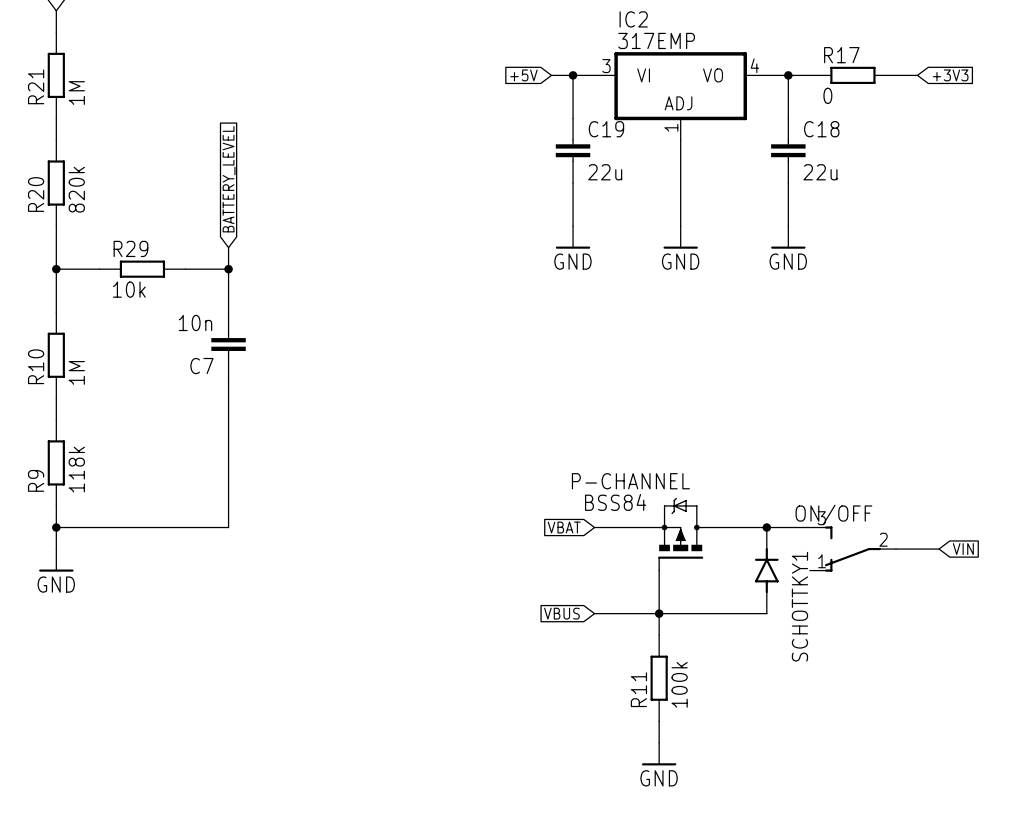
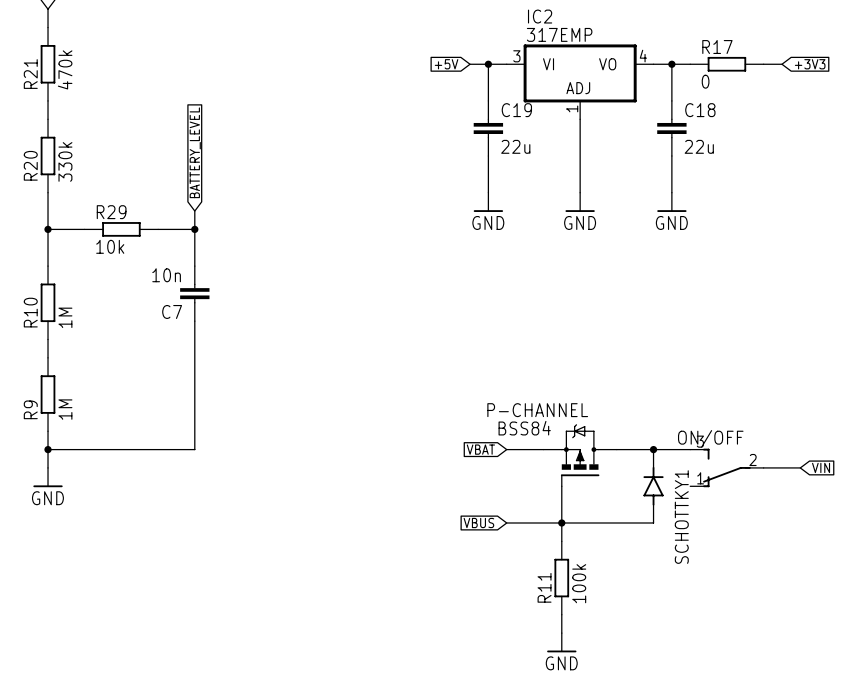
R21 value: 1M (76, 93) -> 470k (65, 69)
R20 value: 820k (76, 189) -> 330k (65, 161)
R9 value: 118k (76, 469) -> 1M (65, 409)

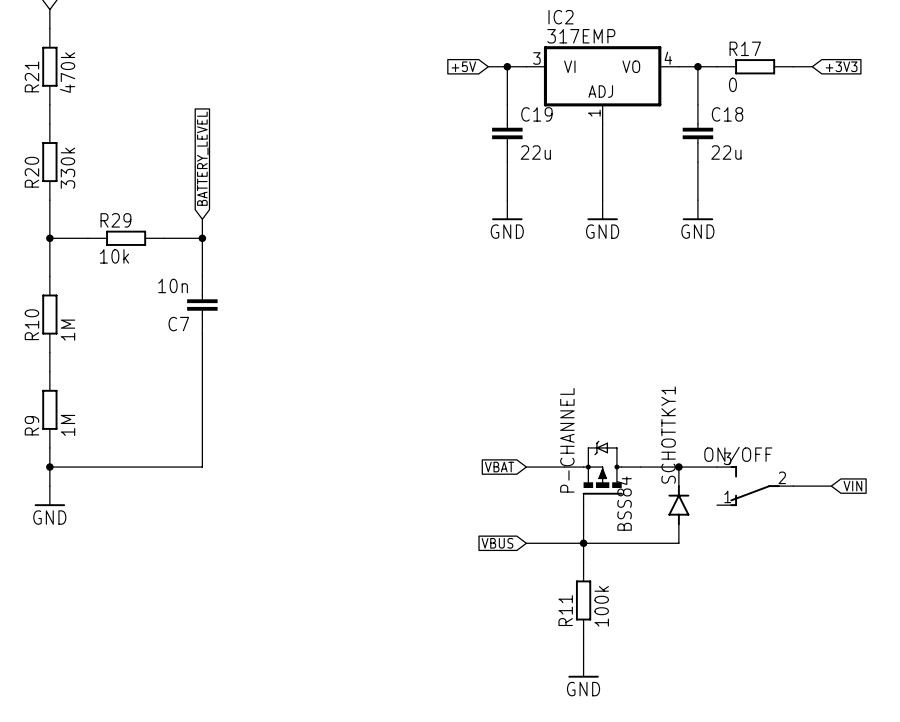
P-CHANNEL name rotation: 0° (537, 410) -> 90° counterclockwise (567, 440)
P-CHANNEL value rotation: 0° (524, 428) -> 90° counterclockwise (624, 503)
P-CHANNEL value position: BSS84 (524, 428) -> BSS84 (624, 503)
SCHOTTKY1 name position: SCHOTTKY1 (681, 517) -> SCHOTTKY1 (668, 435)

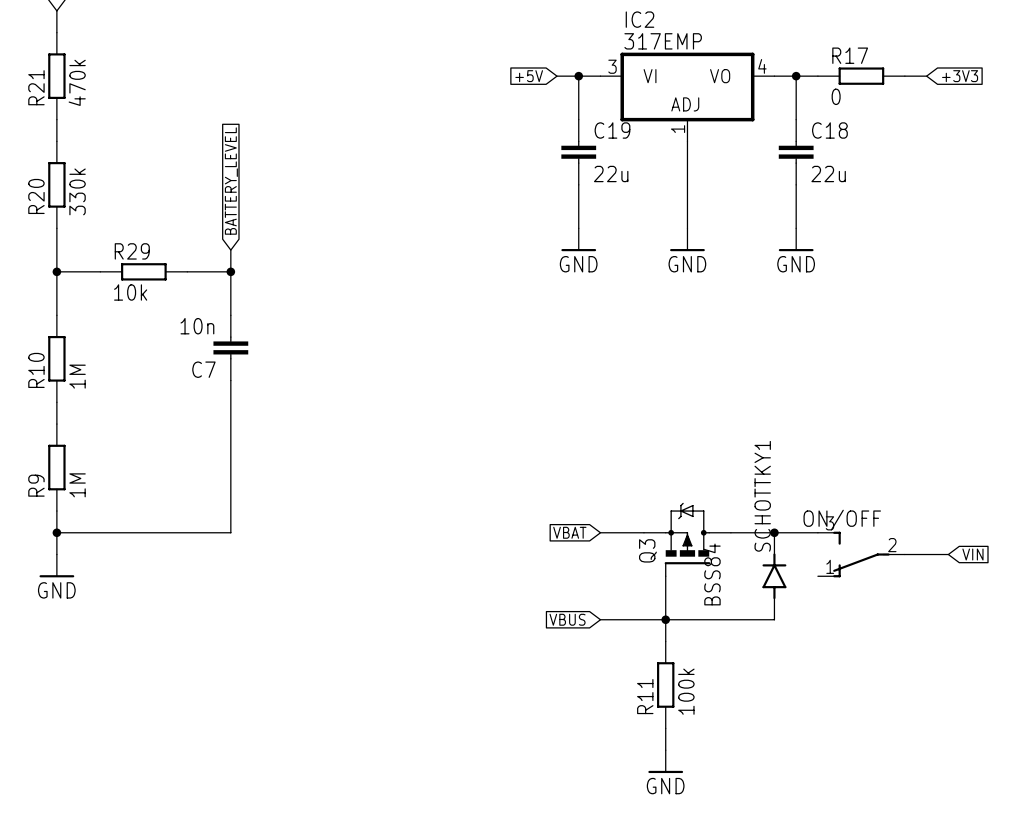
P-CHANNEL name: P-CHANNEL (567, 440) -> Q3 (647, 550)

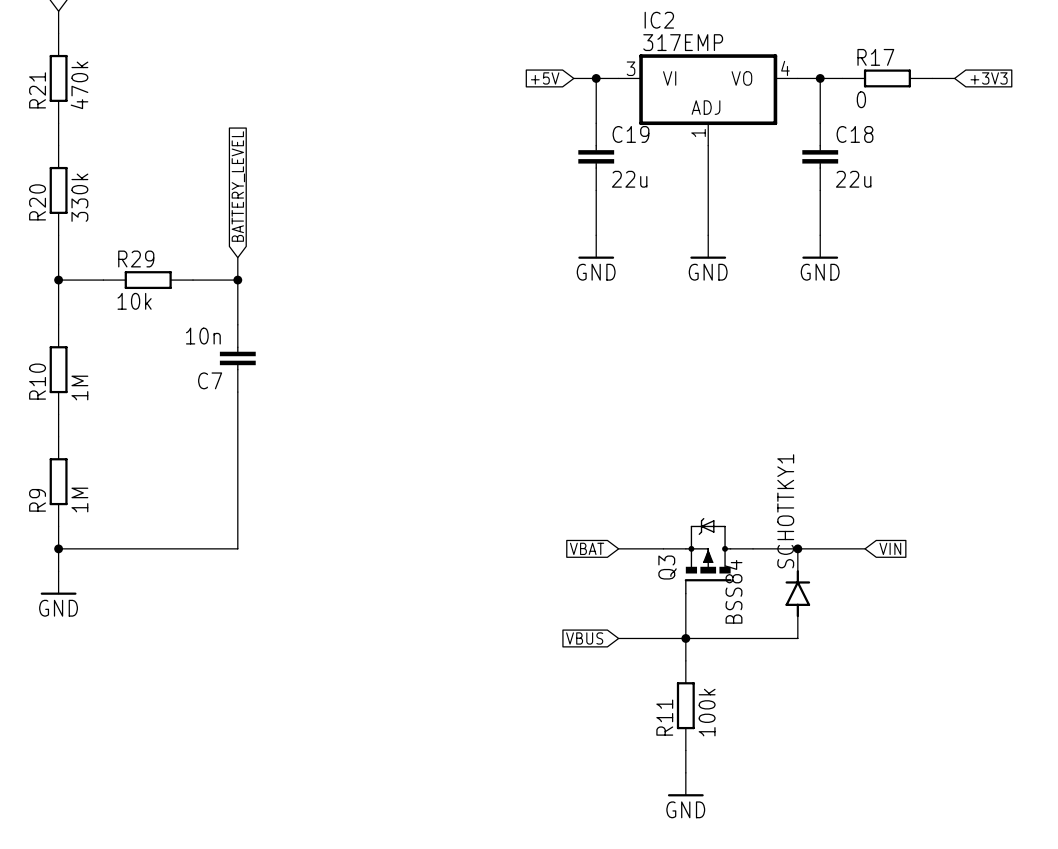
ON/OFF: (861, 554) -> none
wire: (904, 554) (948, 554) -> none
global label position: VIN (972, 554) -> VIN (890, 548)

